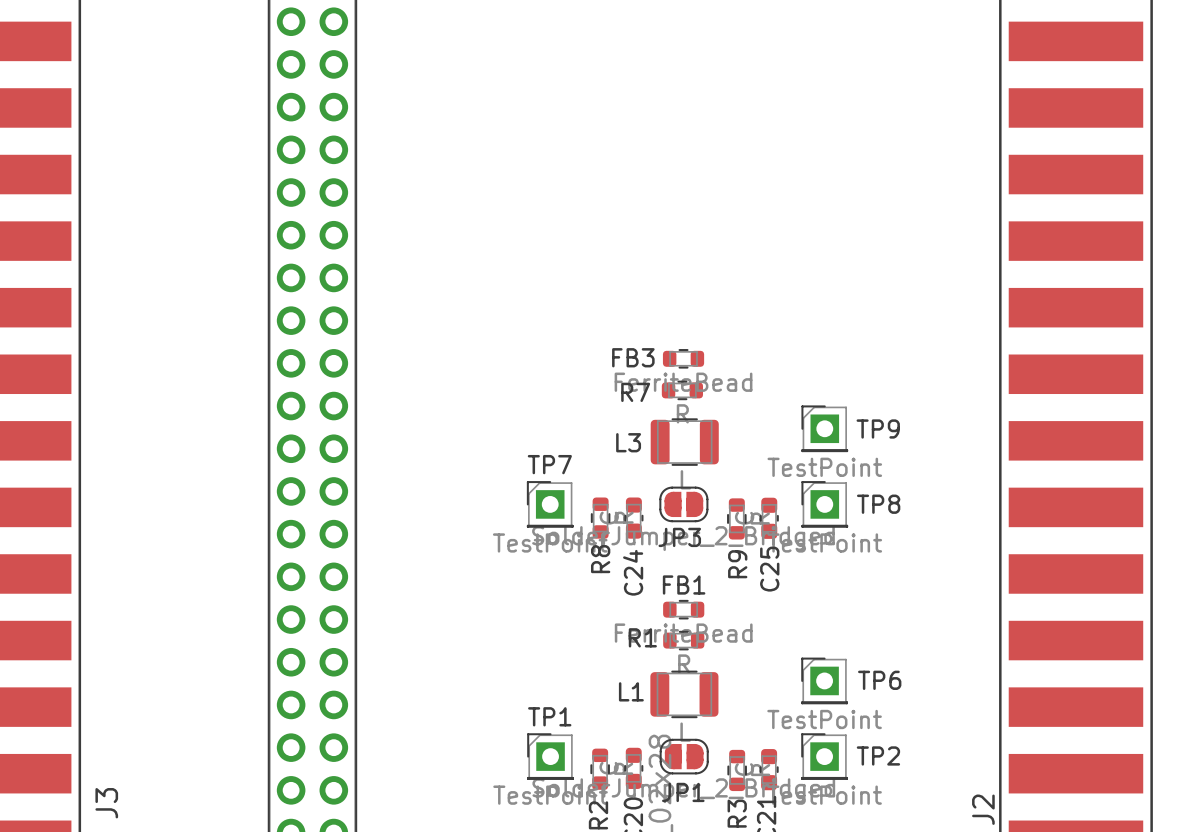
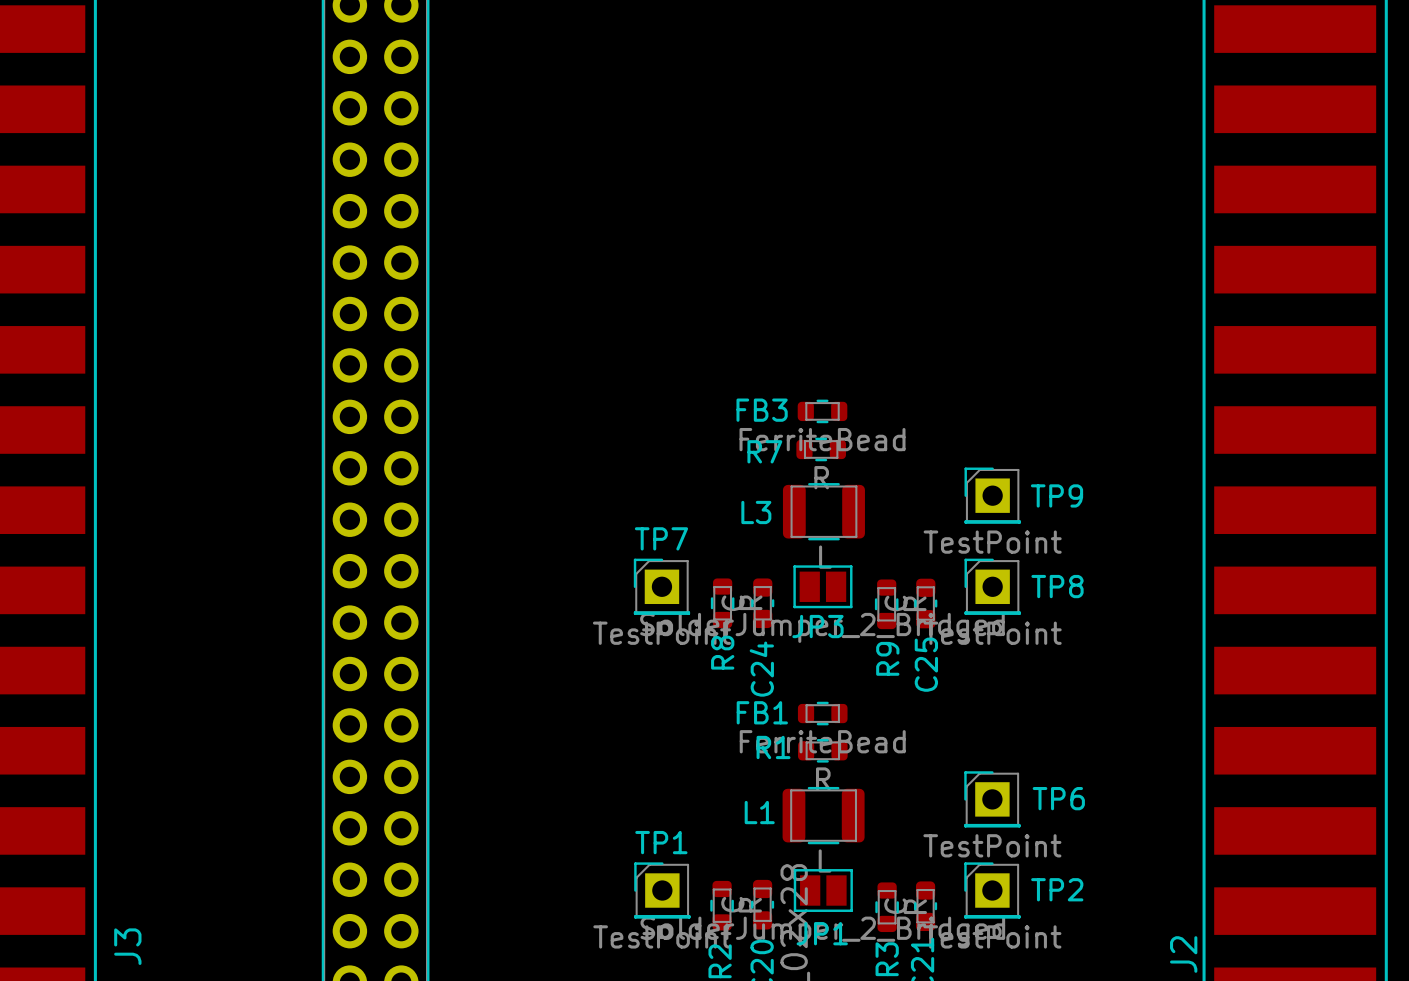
JP3 footprint: [659, 486, 709, 523] -> [793, 565, 853, 609]
FB1 name position: FB1 (684, 584) -> FB1 (762, 712)
JP1 footprint: [659, 738, 709, 775] -> [793, 869, 853, 912]

